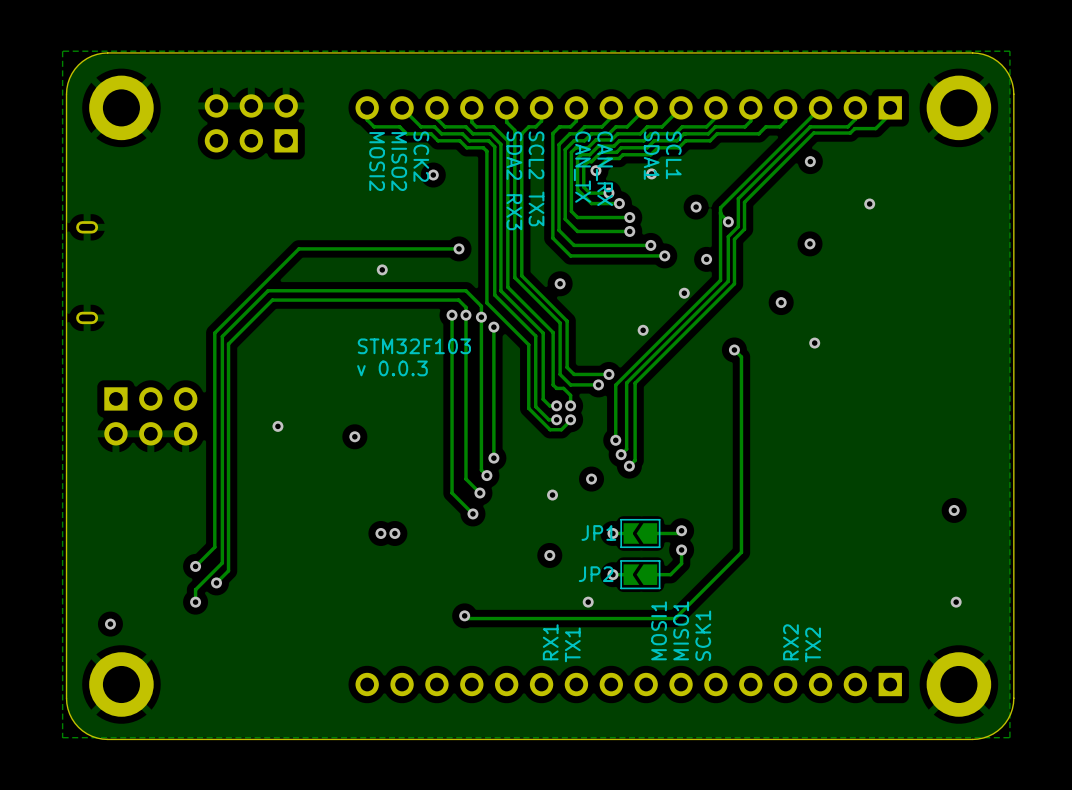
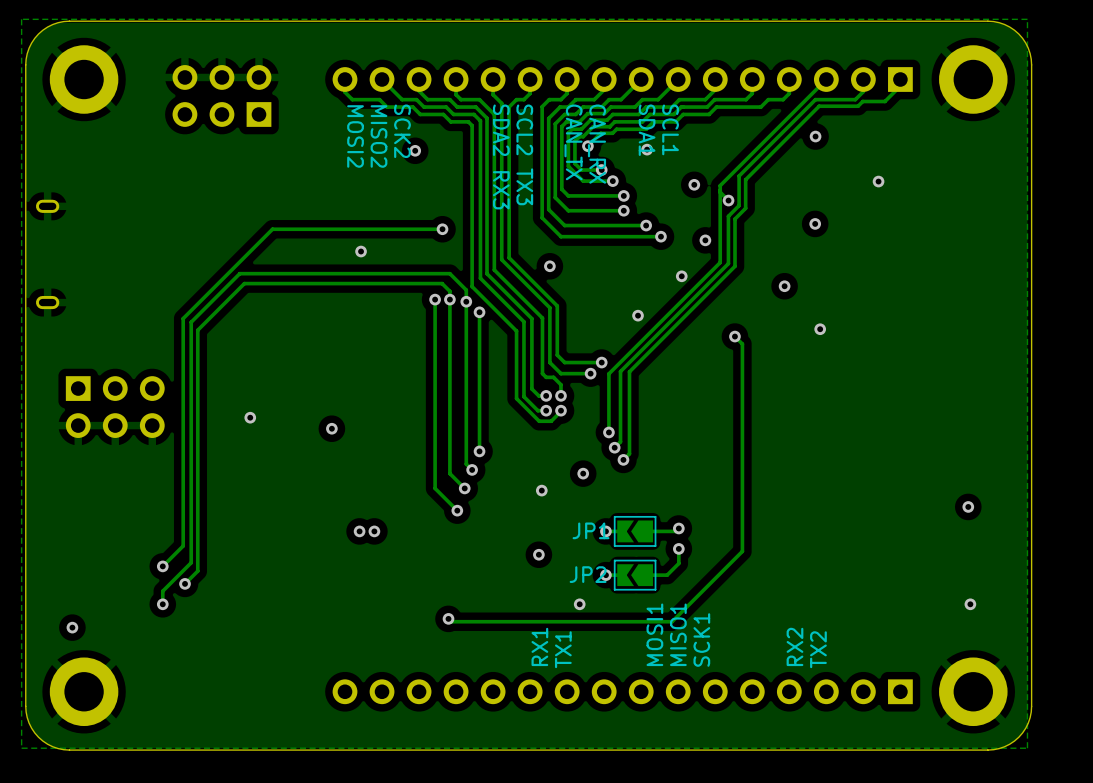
text: STM32F103 (414, 346) -> none
text: v 0.0.3 (392, 368) -> none

